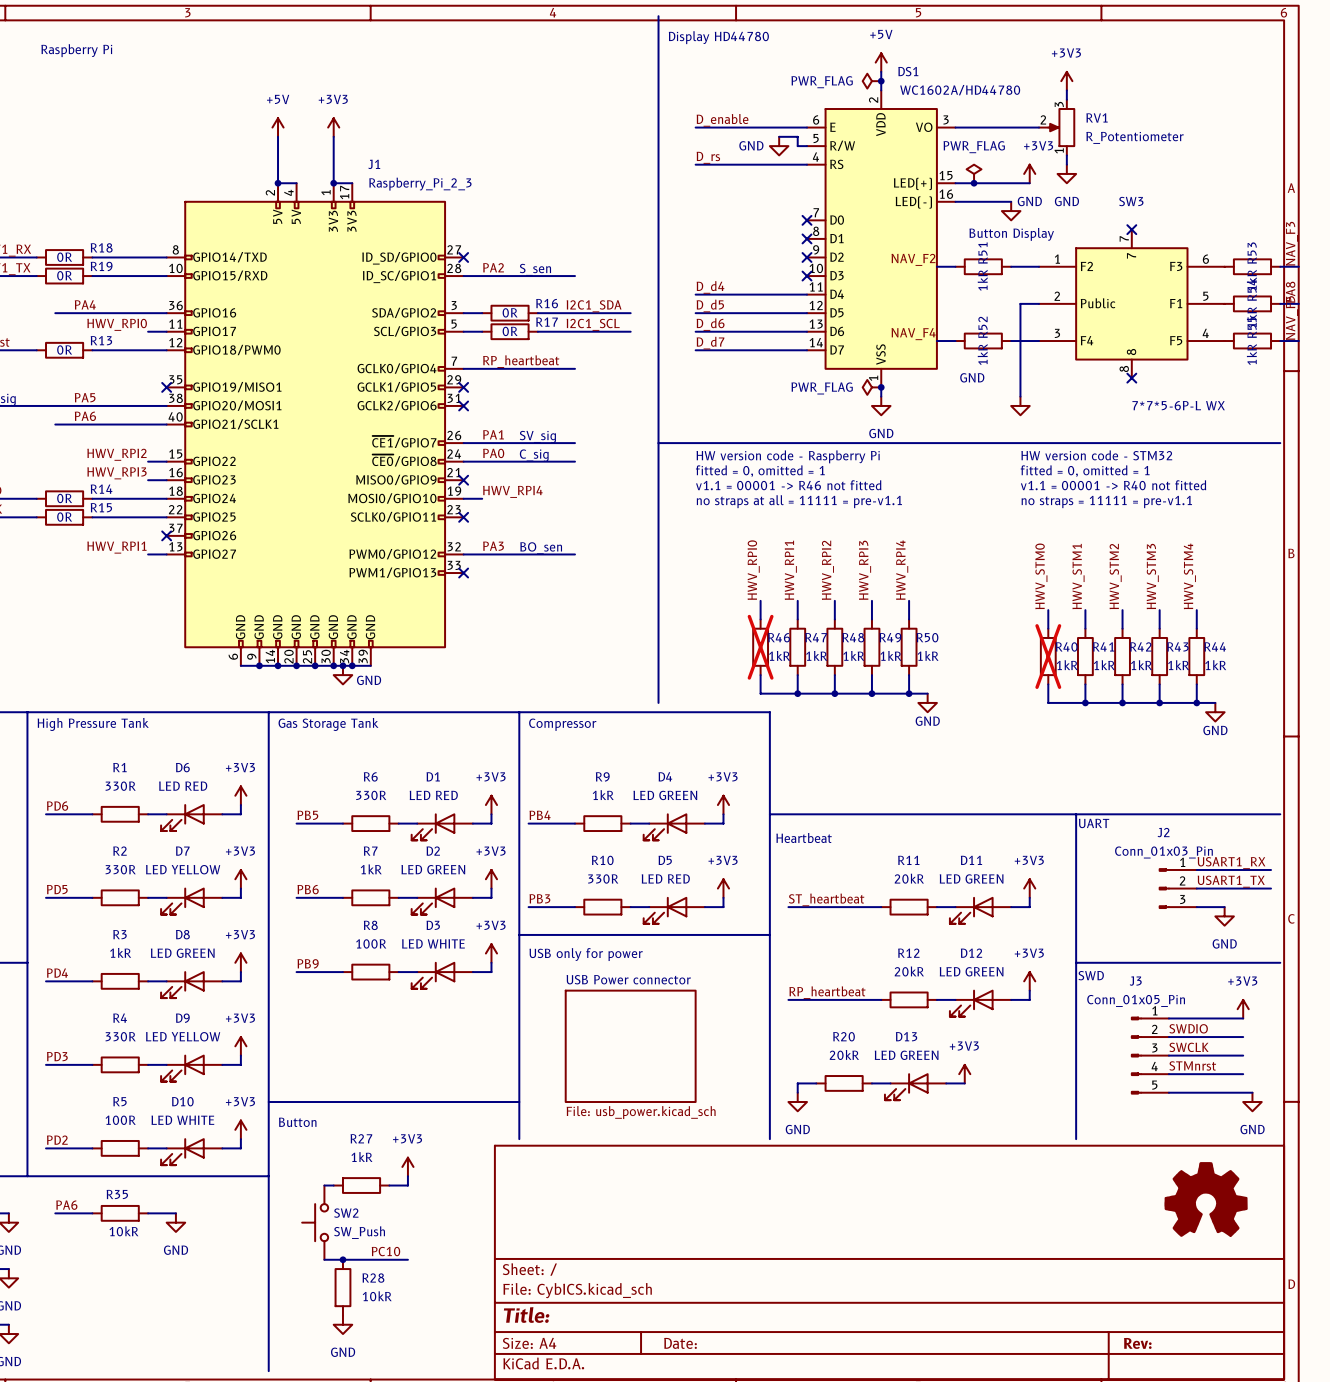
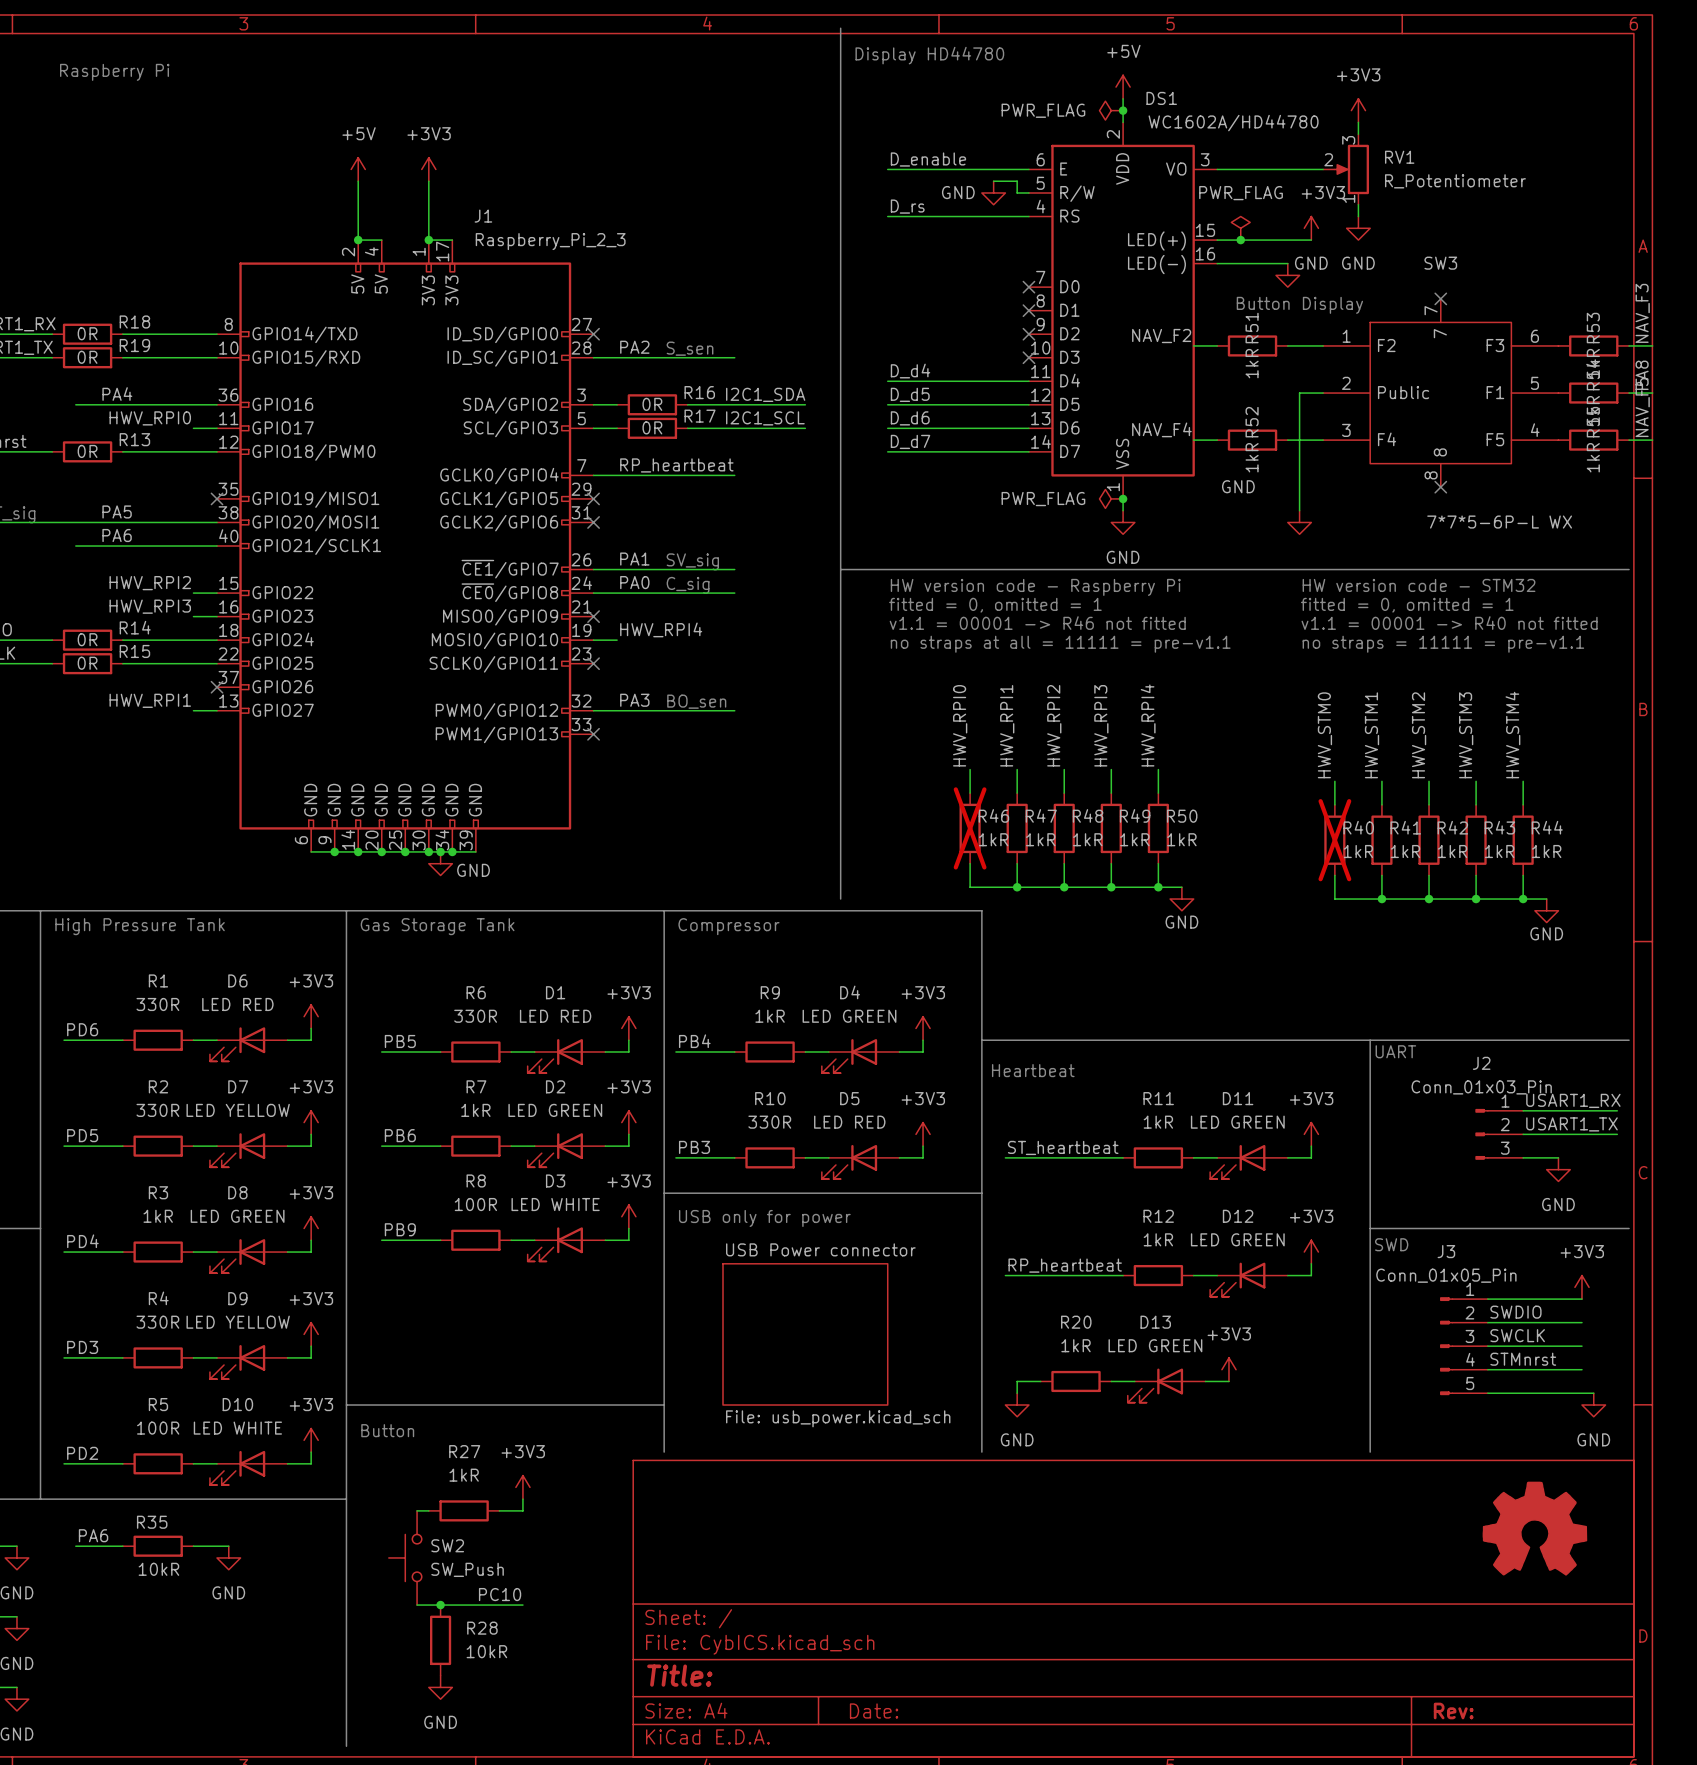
R11 value: 20kR (909, 878) -> 1kR (1158, 1122)
R12 value: 20kR (909, 971) -> 1kR (1158, 1239)
R20 value: 20kR (844, 1055) -> 1kR (1076, 1345)

